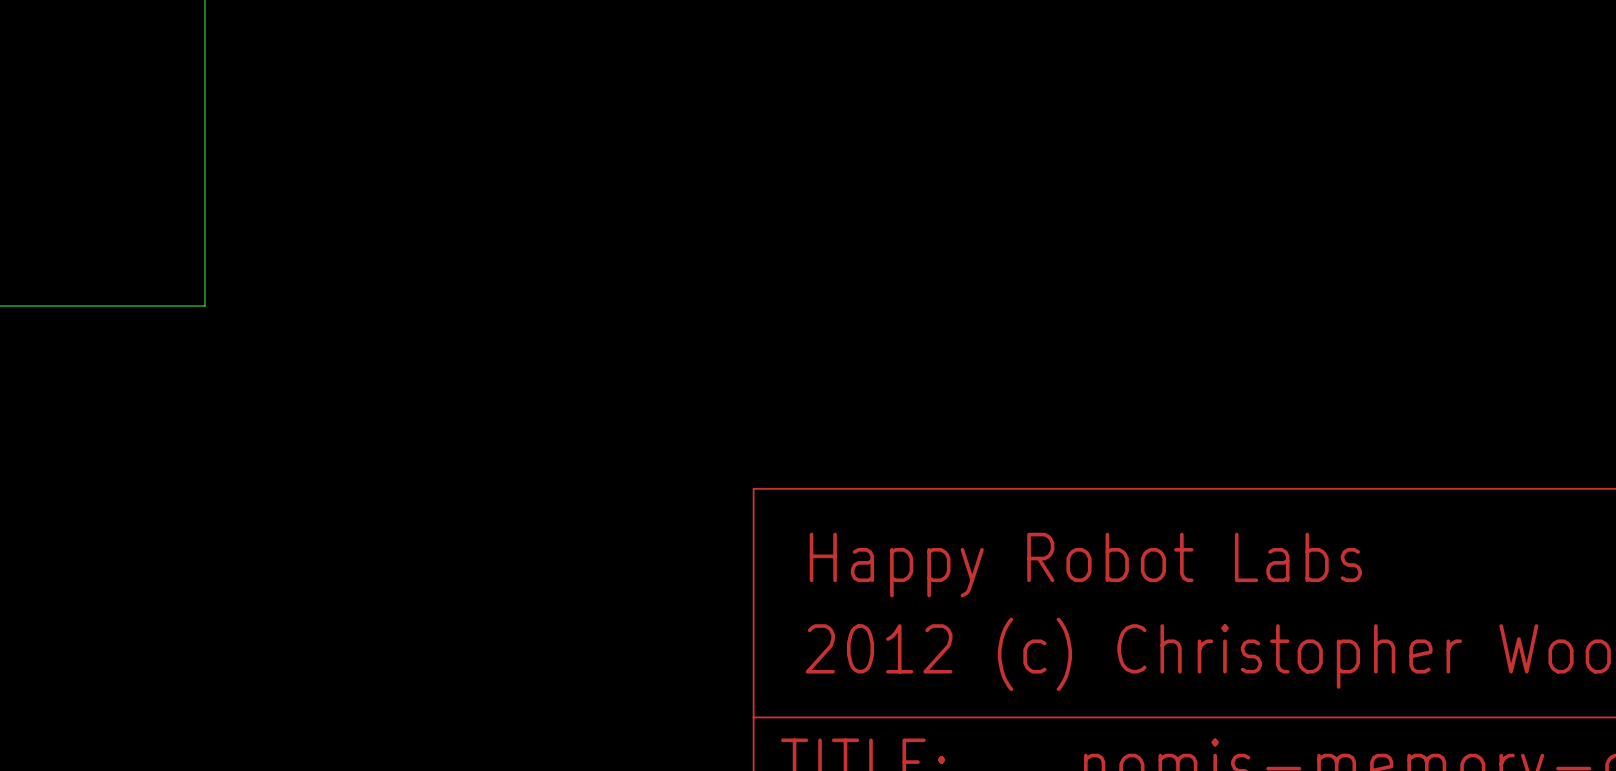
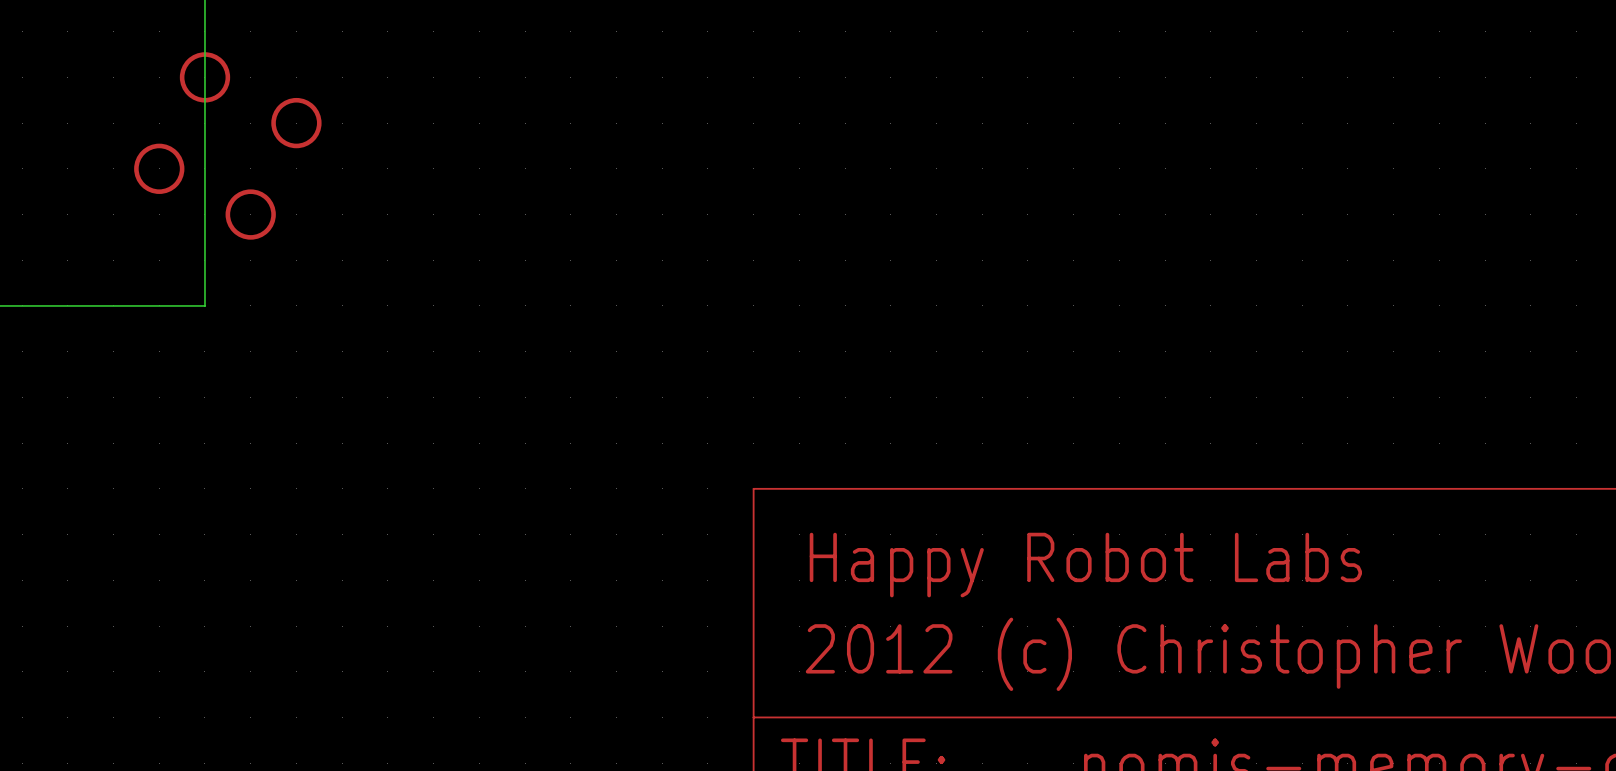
part: none -> (204, 77)
part: none -> (296, 123)
part: none -> (159, 168)
part: none -> (250, 214)

